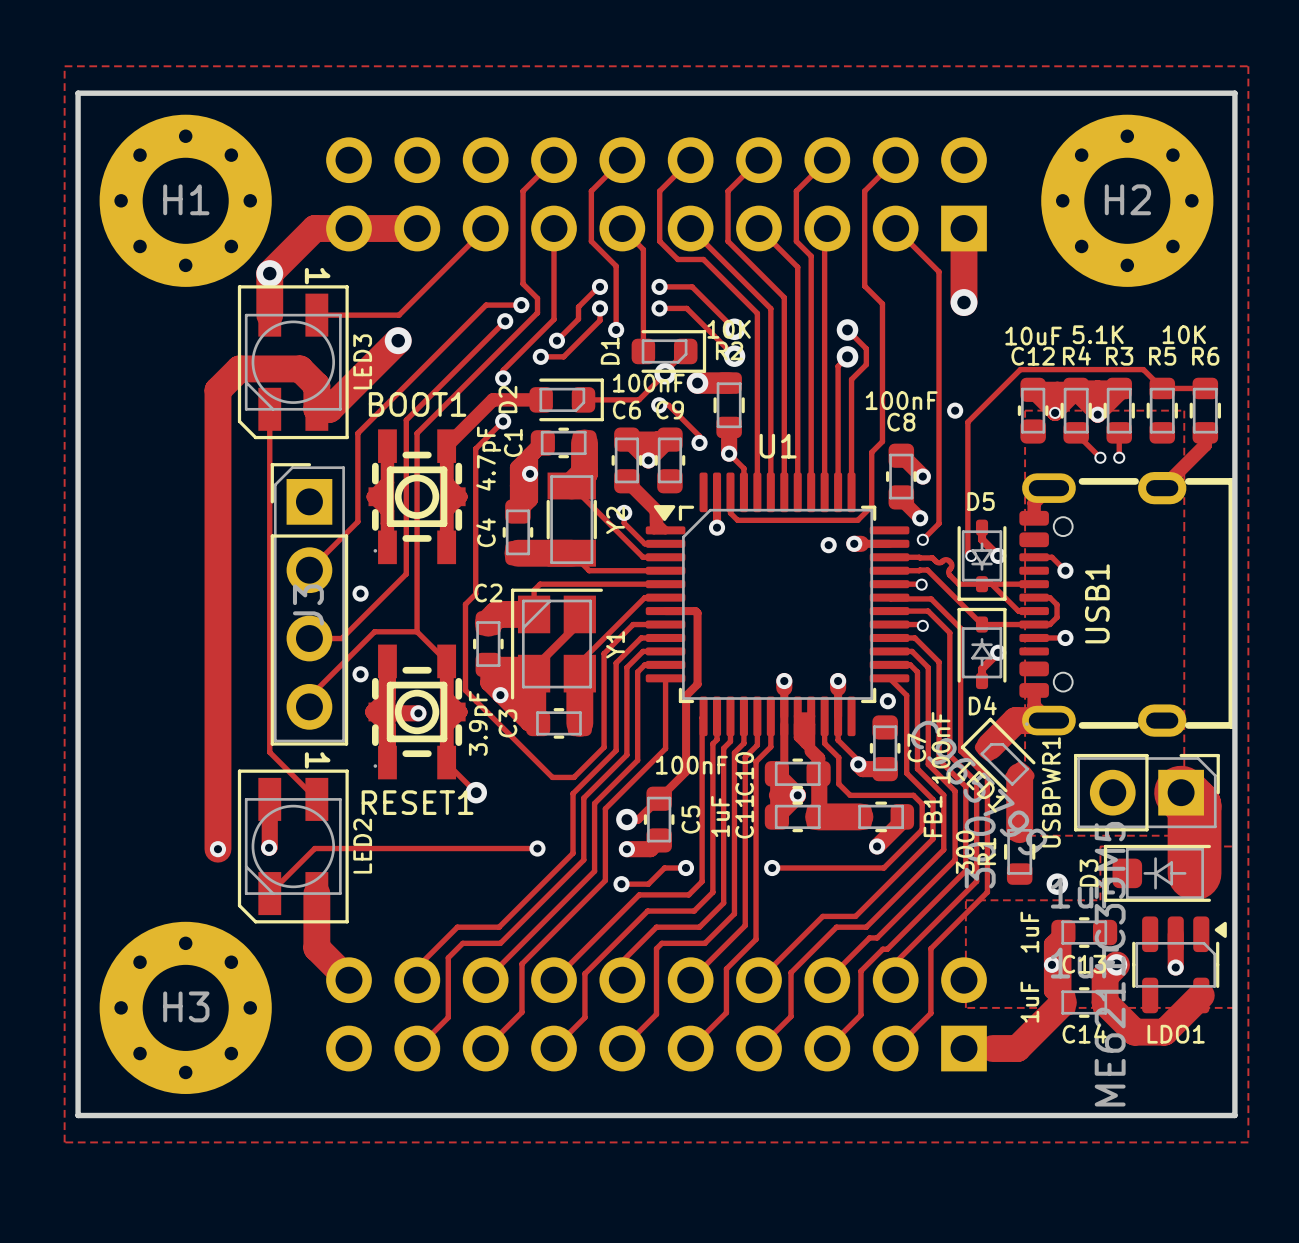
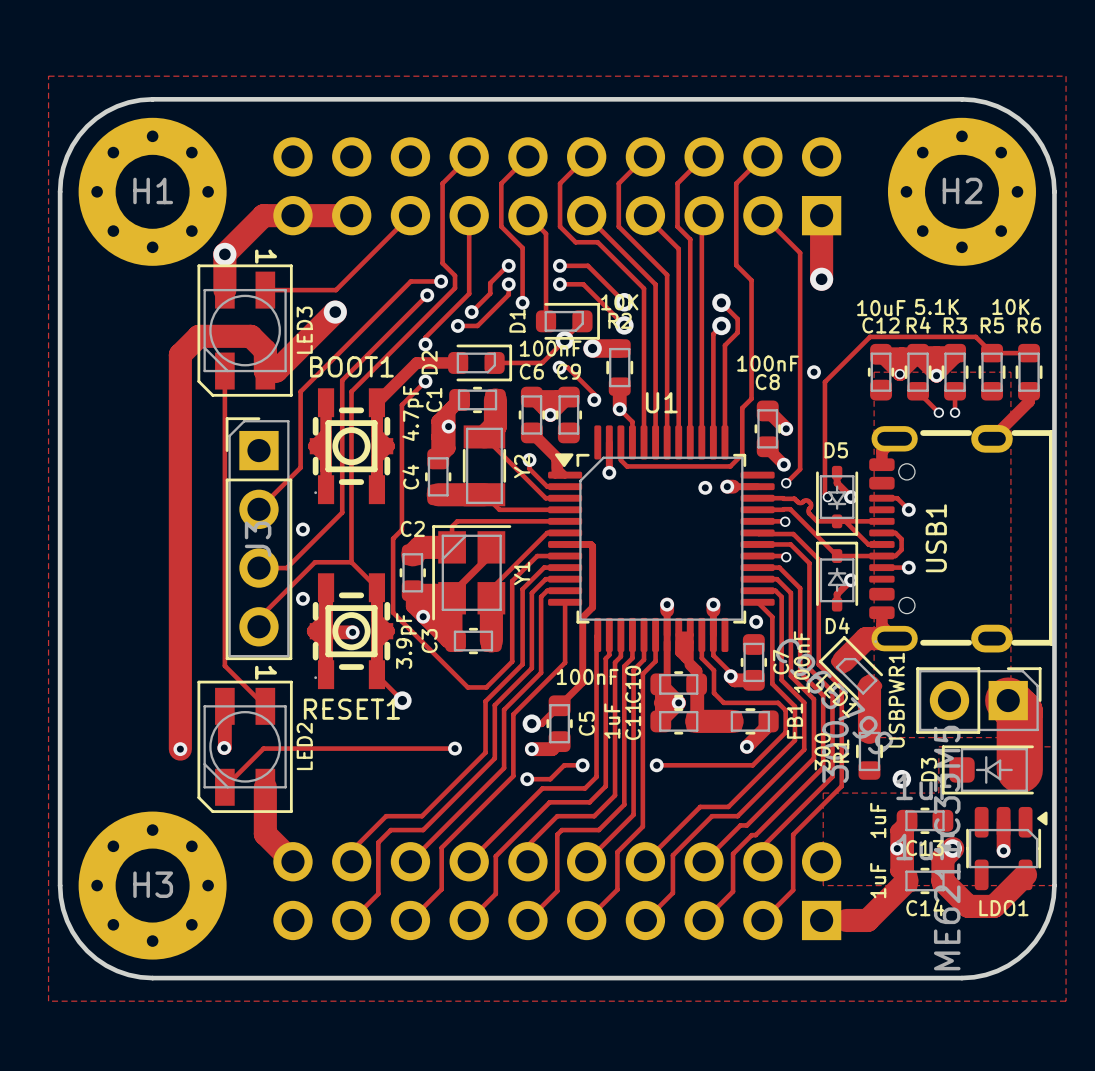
board edge: (185, 93) (78, 93) (78, 200) -> (152, 99) (140, 100) (117, 106) (96, 118) (87, 126) (72, 145) (67, 156) (63, 167) (60, 191)
board edge: (1127, 93) (1234, 93) (1234, 200) -> (961, 99) (985, 102) (997, 106) (1018, 118) (1027, 126) (1035, 135) (1047, 156) (1051, 167) (1054, 191)
board edge: (78, 1007) (78, 1115) (185, 1115) -> (60, 885) (63, 909) (67, 920) (79, 941) (87, 950) (96, 958) (117, 971) (128, 974) (152, 978)
board edge: (1234, 1007) (1234, 1115) (1127, 1115) -> (1054, 885) (1051, 909) (1047, 920) (1035, 941) (1027, 950) (1018, 958) (997, 971) (974, 977) (961, 978)

